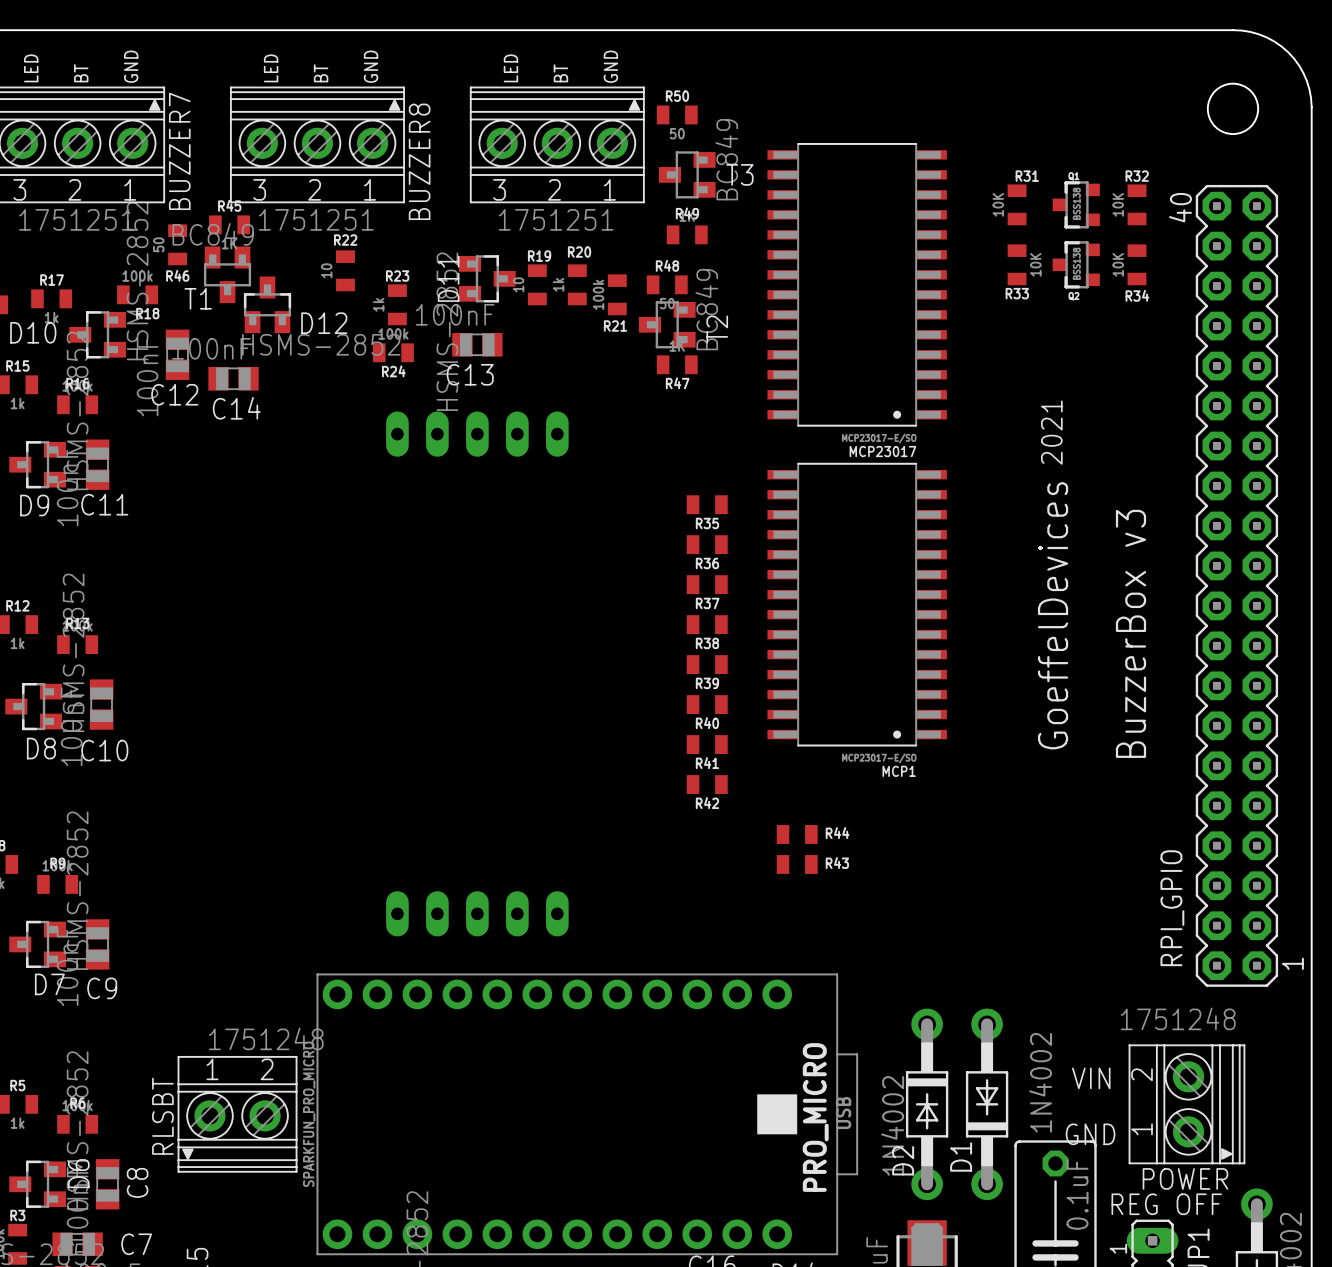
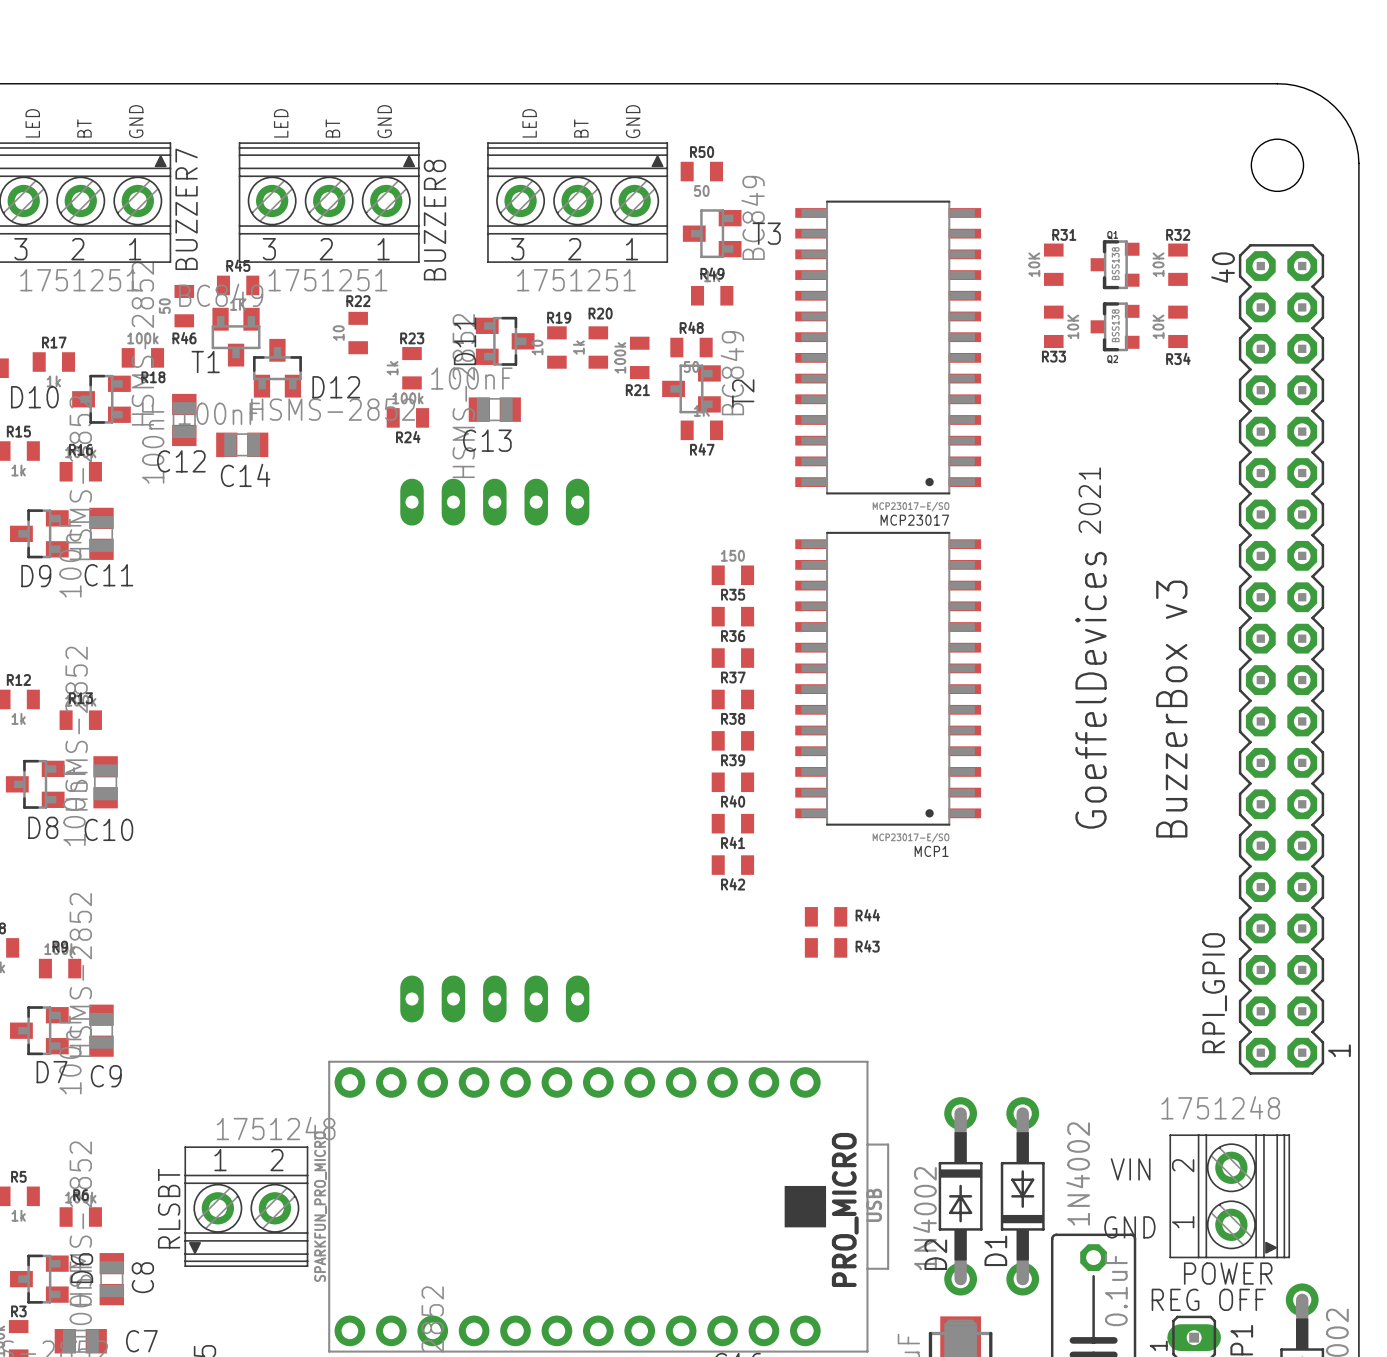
R35 value: none -> 150 (732, 555)

